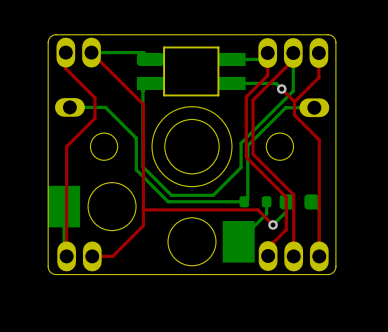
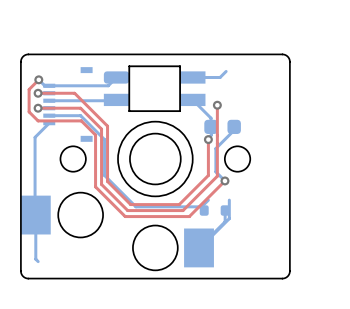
top track: (65, 52) (65, 68) (94, 97) (94, 118) (66, 146) (66, 256) -> none
part: (65, 52) -> none
top track: (91, 52) (143, 104) (143, 225) (112, 256) (92, 256) -> none
bottom track: (91, 52) (143, 52) (150, 59) -> (38, 79) (44, 85) (108, 85) (116, 77)
part: (91, 52) -> none
top track: (267, 52) (267, 75) (246, 96) (246, 157) (286, 197) (286, 229) (268, 247) (268, 256) -> none
part: (267, 52) -> none
top track: (293, 52) (293, 59) (253, 100) (253, 154) (293, 194) (293, 256) -> none
bottom track: (293, 52) (293, 91) (241, 143) (241, 167) (213, 195) (171, 195) (142, 166) (142, 91) (149, 84) -> (49, 100) (115, 100)
part: (293, 52) -> none
top track: (318, 52) (318, 77) (294, 101) -> none
part: (318, 52) -> none
top track: none -> (38, 79) (29, 89) (29, 111) (38, 120) (81, 120) (95, 135) (95, 186) (125, 216) (189, 216) (224, 180)
via: none -> (38, 79)
top track: none -> (38, 93) (74, 93) (107, 126) (107, 181) (130, 204) (179, 204) (208, 175) (208, 139)
via: none -> (38, 93)
bottom track: (232, 83) (276, 83) (281, 89) -> (192, 99) (211, 118) (211, 135) (208, 139)
part: none -> (67, 104)
top track: none -> (217, 105) (219, 105) (217, 107) (217, 176) (183, 210) (127, 210) (101, 184) (101, 129) (80, 108) (38, 108)
top track: (281, 89) (294, 101) -> none
via position: (281, 89) -> (217, 105)
via: none -> (38, 108)
bottom track: none -> (49, 115) (80, 115) (104, 139) (104, 175) (135, 206) (201, 206) (208, 200)
top track: (294, 101) (294, 115) (319, 139) (319, 256) -> none
bottom track: (69, 107) (105, 107) (136, 138) (136, 169) (168, 201) (244, 201) (247, 198) (247, 145) (285, 107) (314, 107) -> none
part: (69, 107) -> none
part: (314, 107) -> none
bottom track: none -> (49, 123) (35, 137) (34, 215)
bottom track: none -> (234, 126) (234, 130) (215, 148) (215, 171) (224, 180)
via: none -> (208, 139)
via: none -> (224, 180)
bottom track: none -> (229, 200) (229, 218) (200, 247)
bottom track: (286, 201) (286, 211) (273, 224) -> none
part position: (299, 201) -> (222, 126)
top track: (143, 209) (258, 209) (273, 224) -> none
via: (273, 224) -> none
part: (66, 256) -> none
part: (92, 256) -> none
part: (268, 256) -> none
part: (293, 256) -> none
part: (319, 256) -> none

